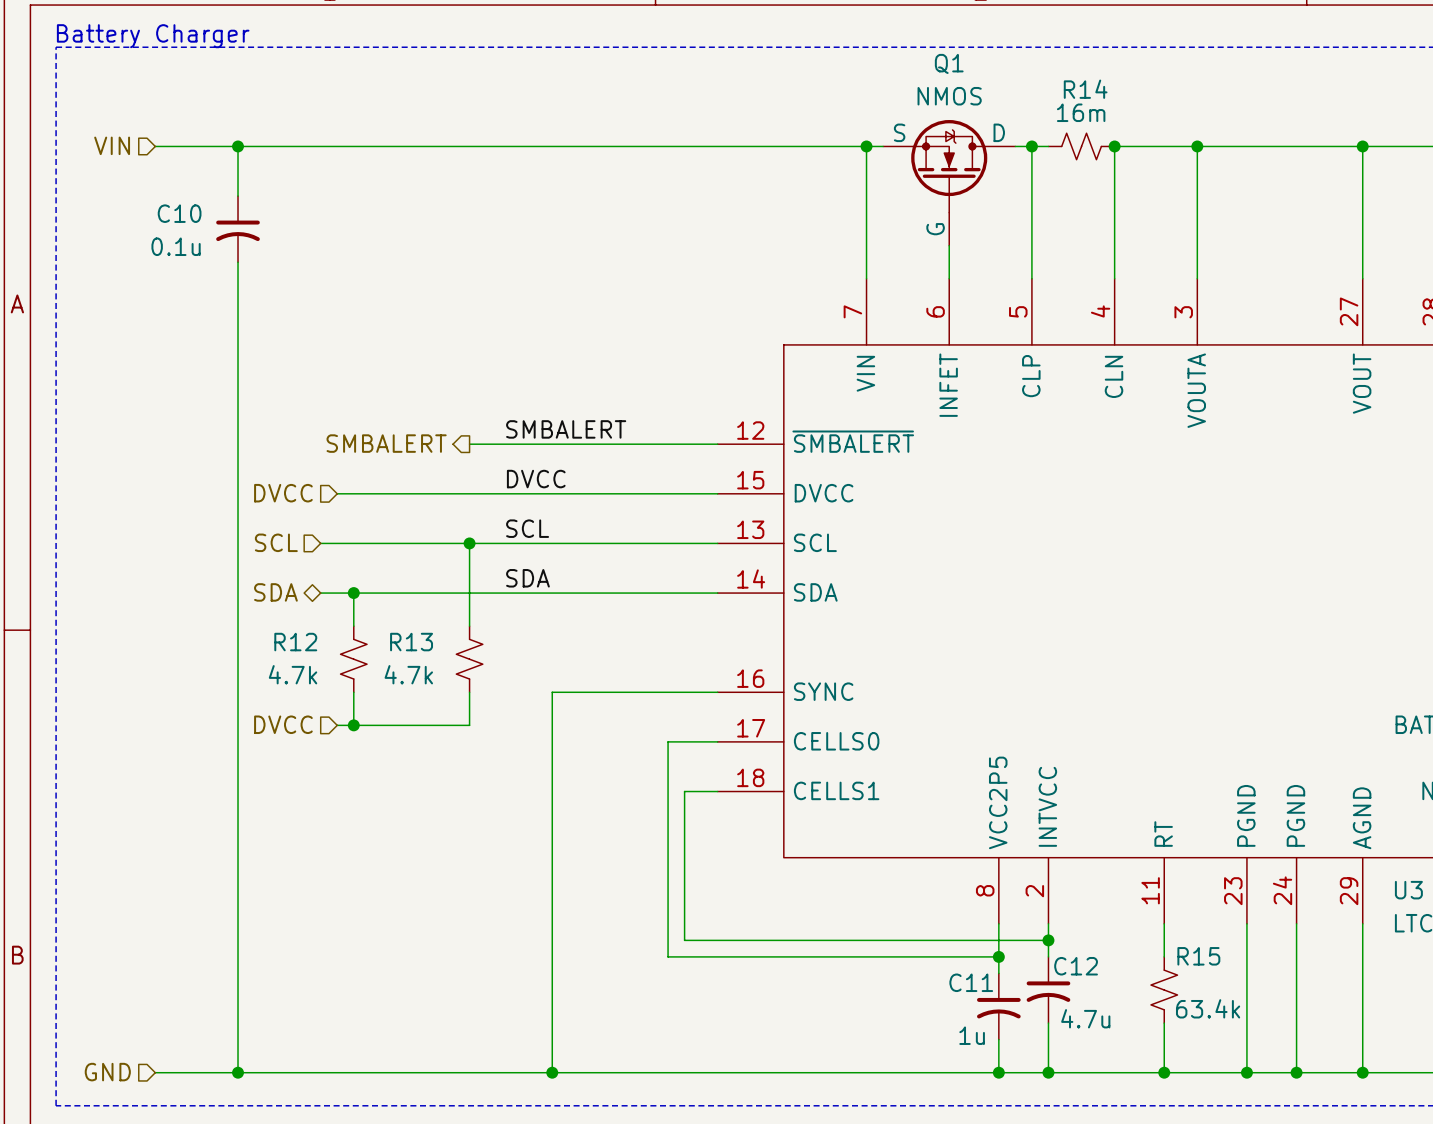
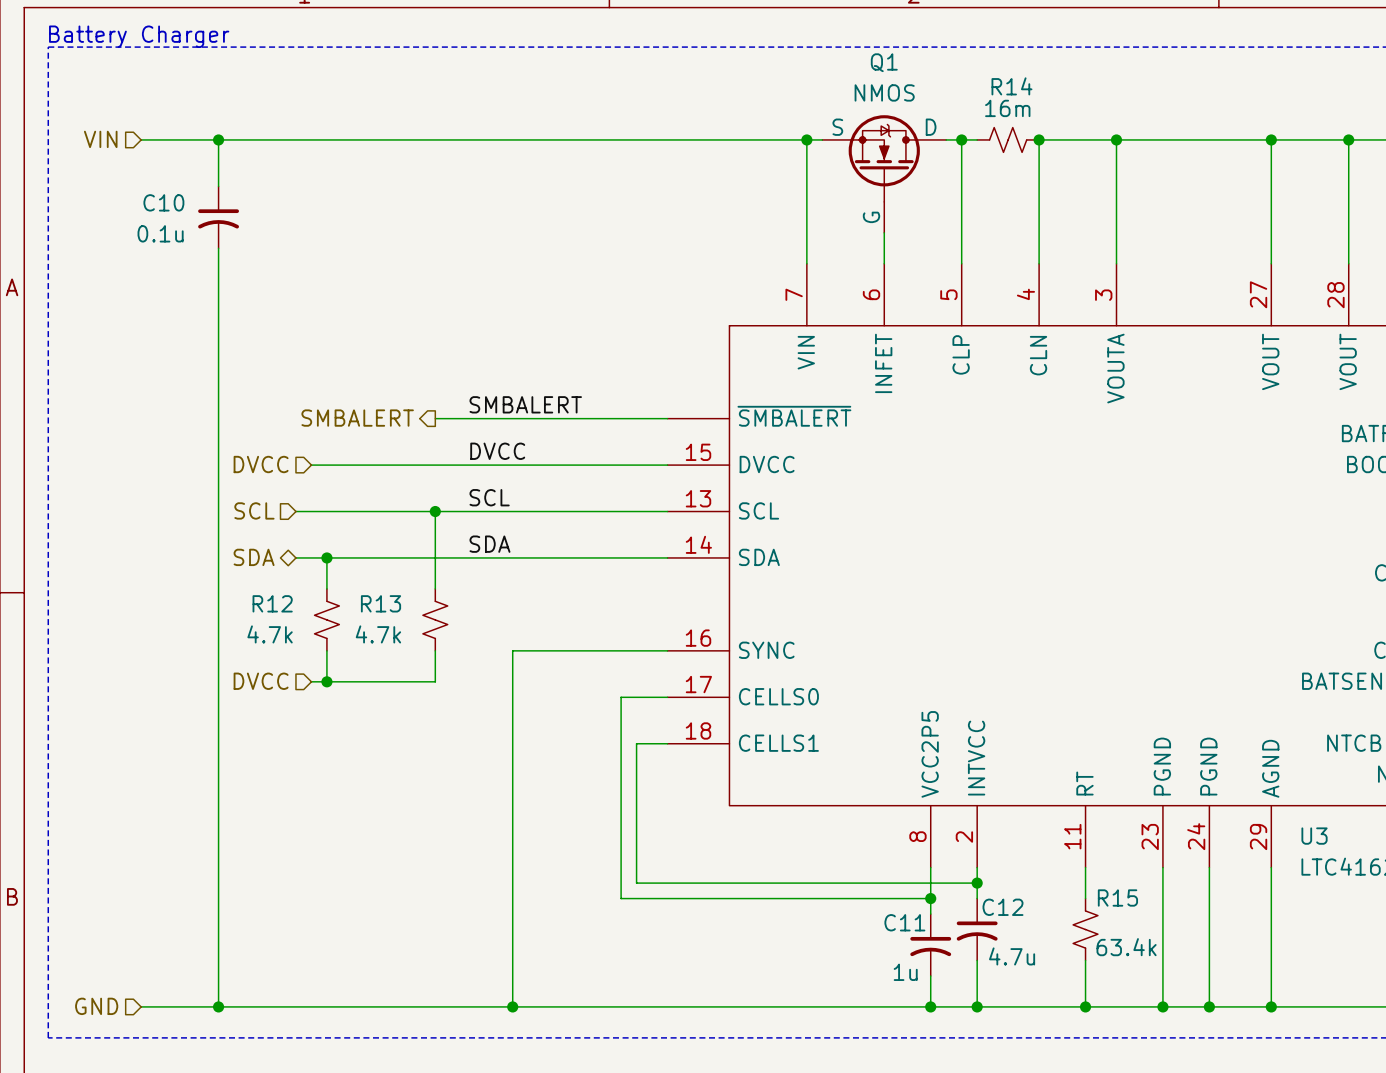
U3 pin number: 12 (750, 430) -> none

